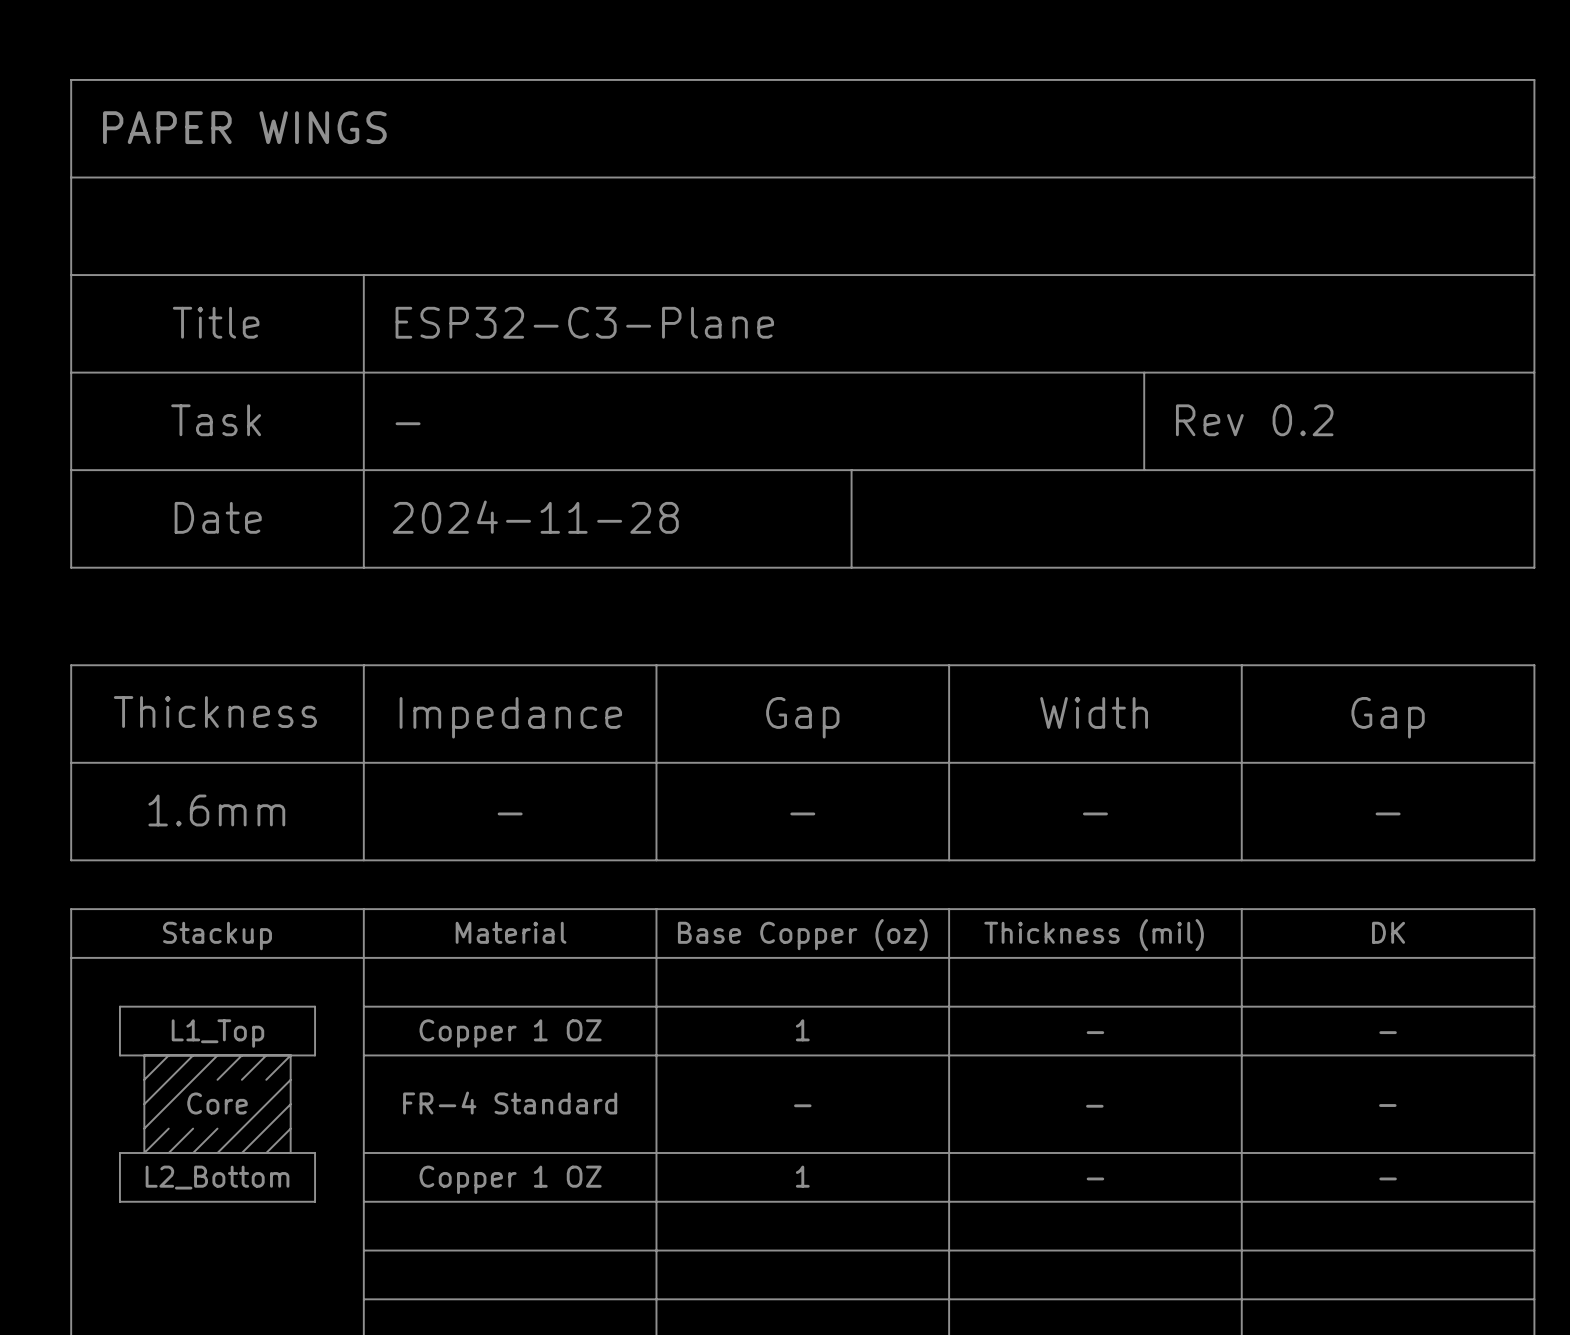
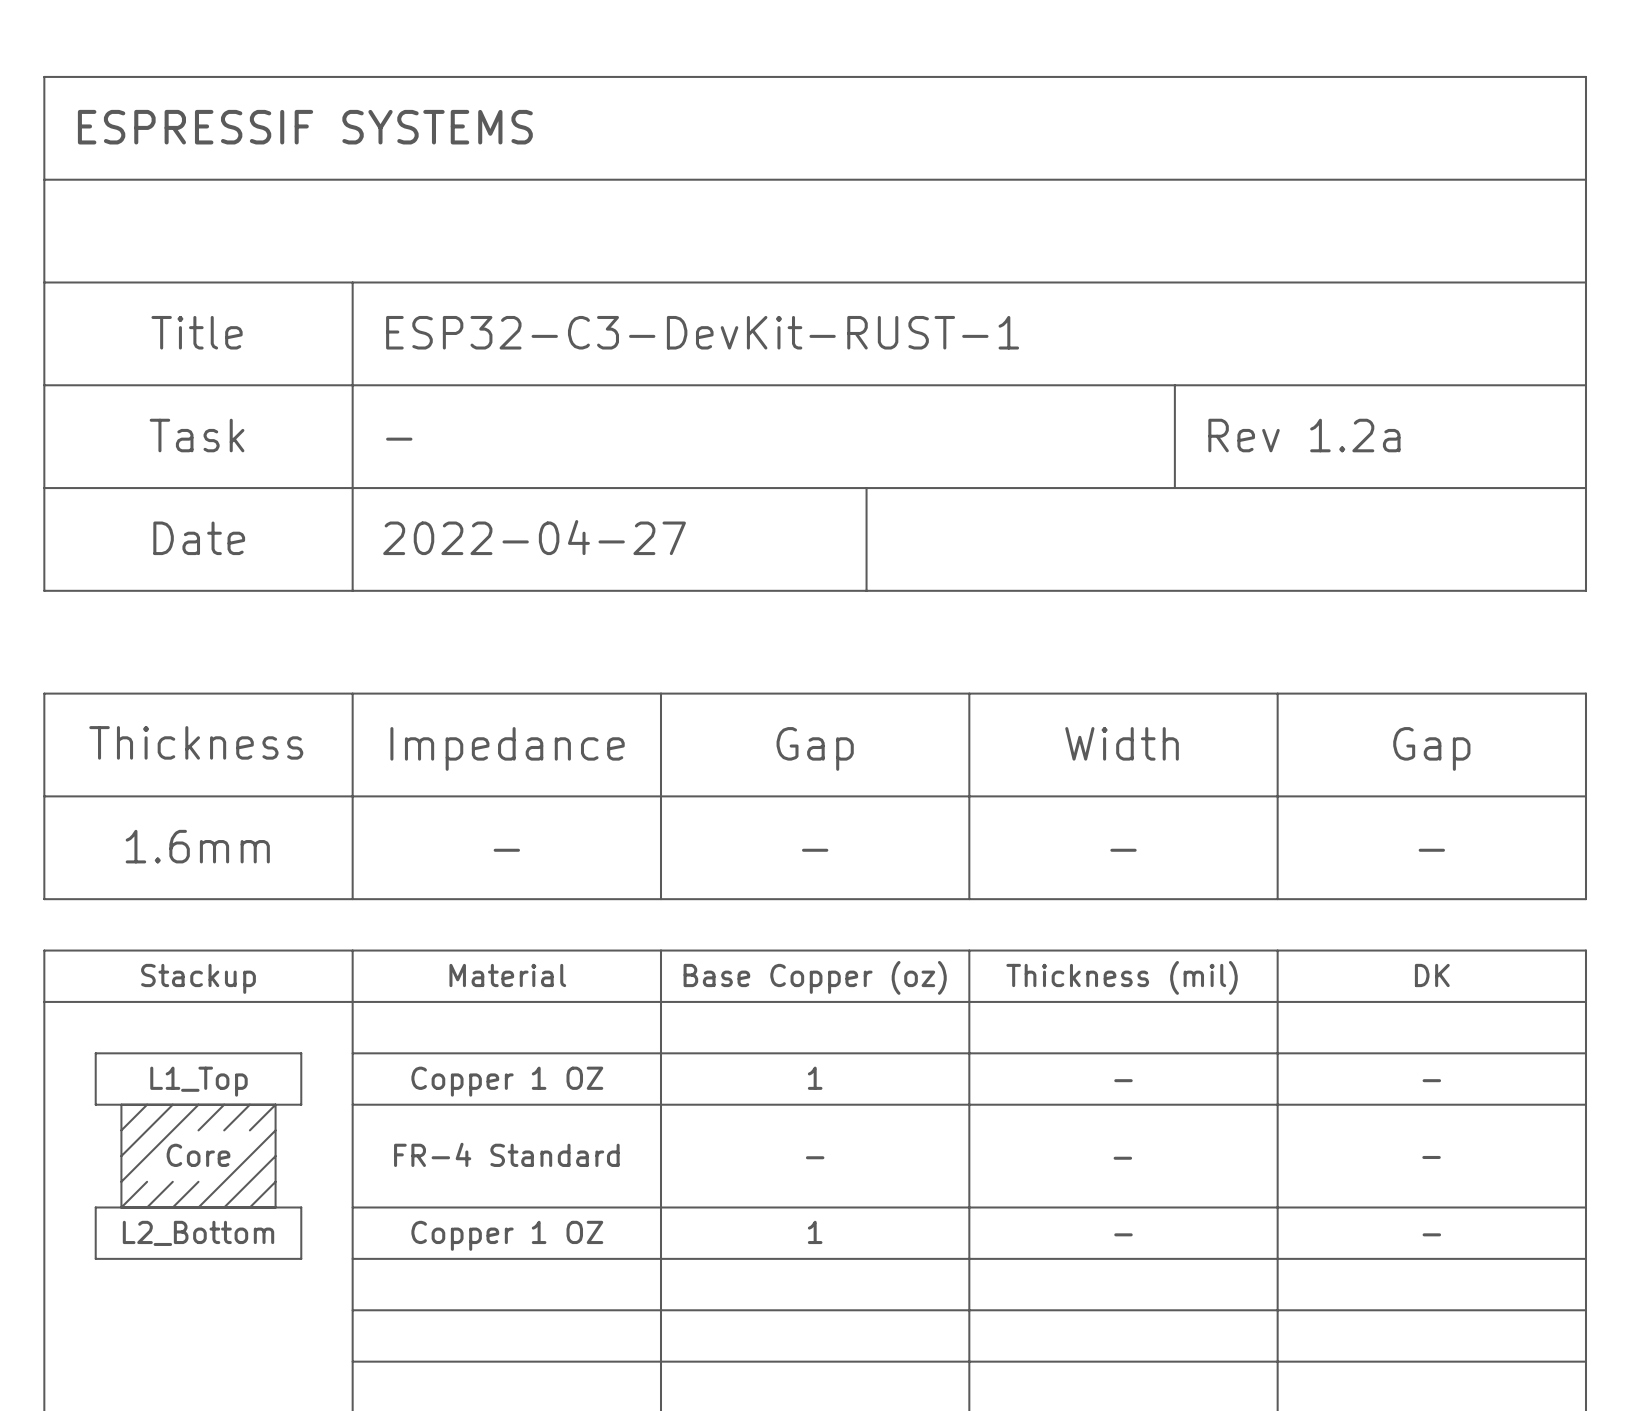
text: PAPER WINGS (244, 127) -> ESPRESSIF SYSTEMS (305, 127)
text: ESP32-C3-Plane (584, 322) -> ESP32-C3-DevKit-RUST-1 (702, 332)
text: Rev 0.2 (1254, 420) -> Rev 1.2a (1304, 435)
text: 2024-11-28 (535, 517) -> 2022-04-27 (534, 537)

